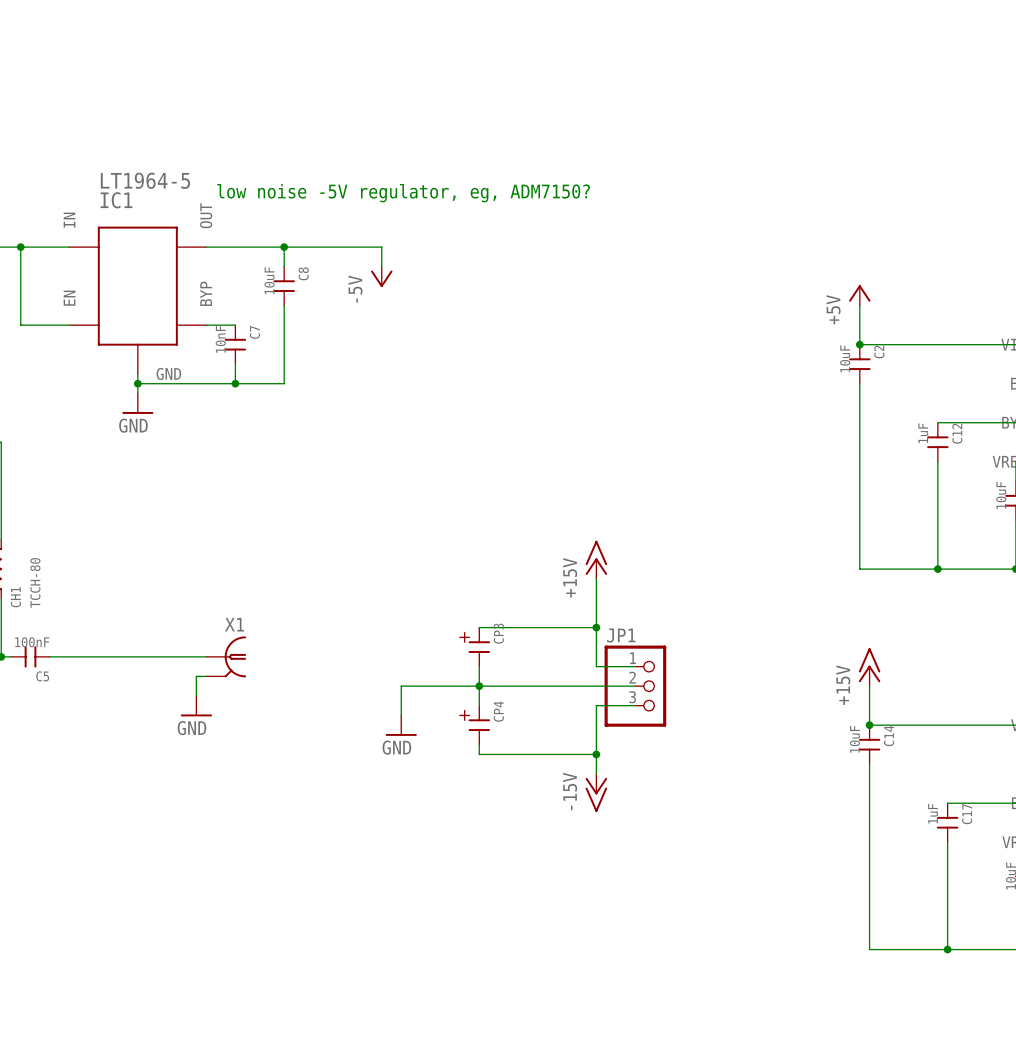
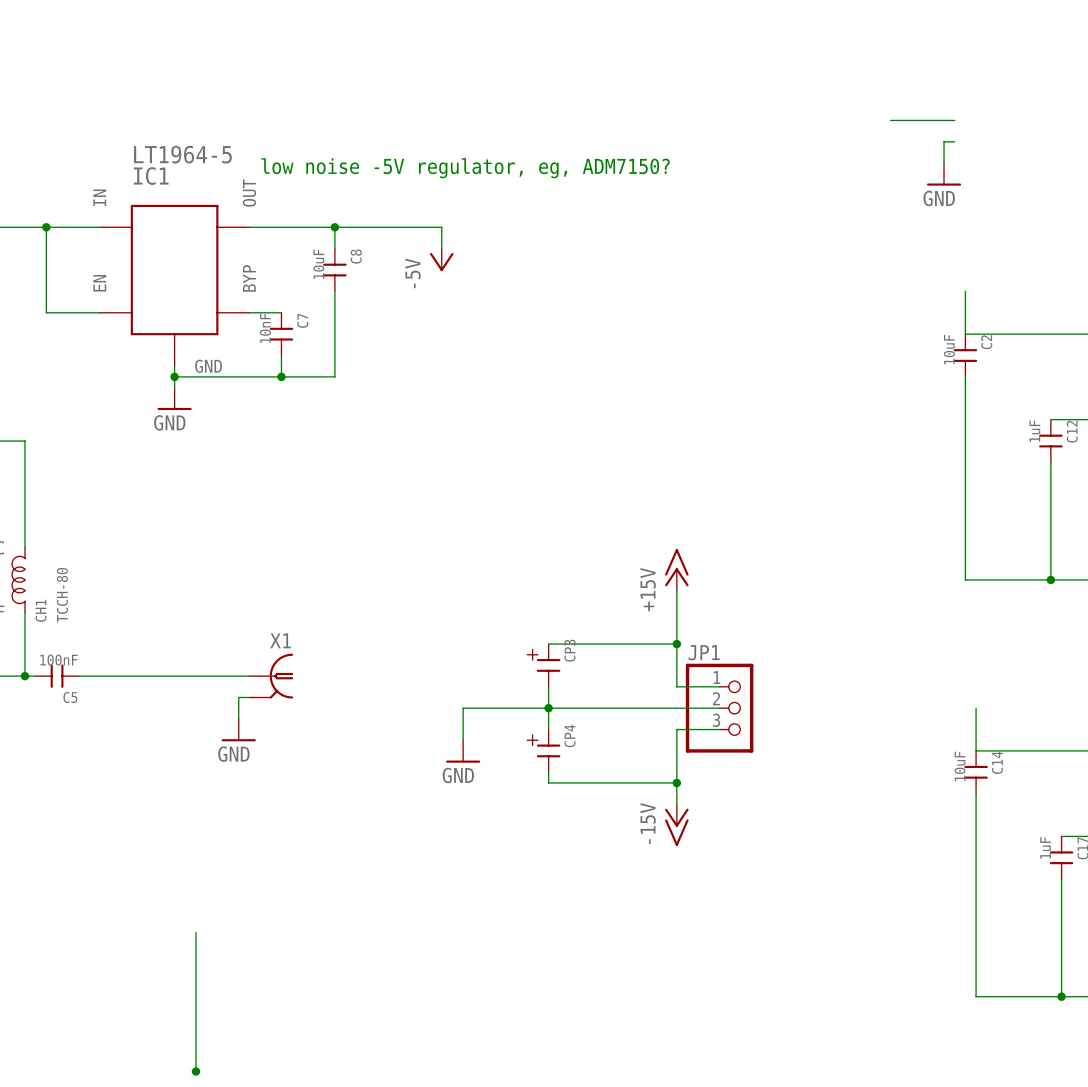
wire: none -> (890, 120) (954, 120)
wire: none -> (954, 141) (944, 141) (944, 163)
power symbol: none -> GND (944, 174)
power symbol: +5V (859, 295) -> none
junction: (859, 344) -> none
power symbol: +15V (869, 667) -> none
junction: (869, 725) -> none
wire: none -> (195, 932) (195, 1071)
junction: none -> (195, 1071)

